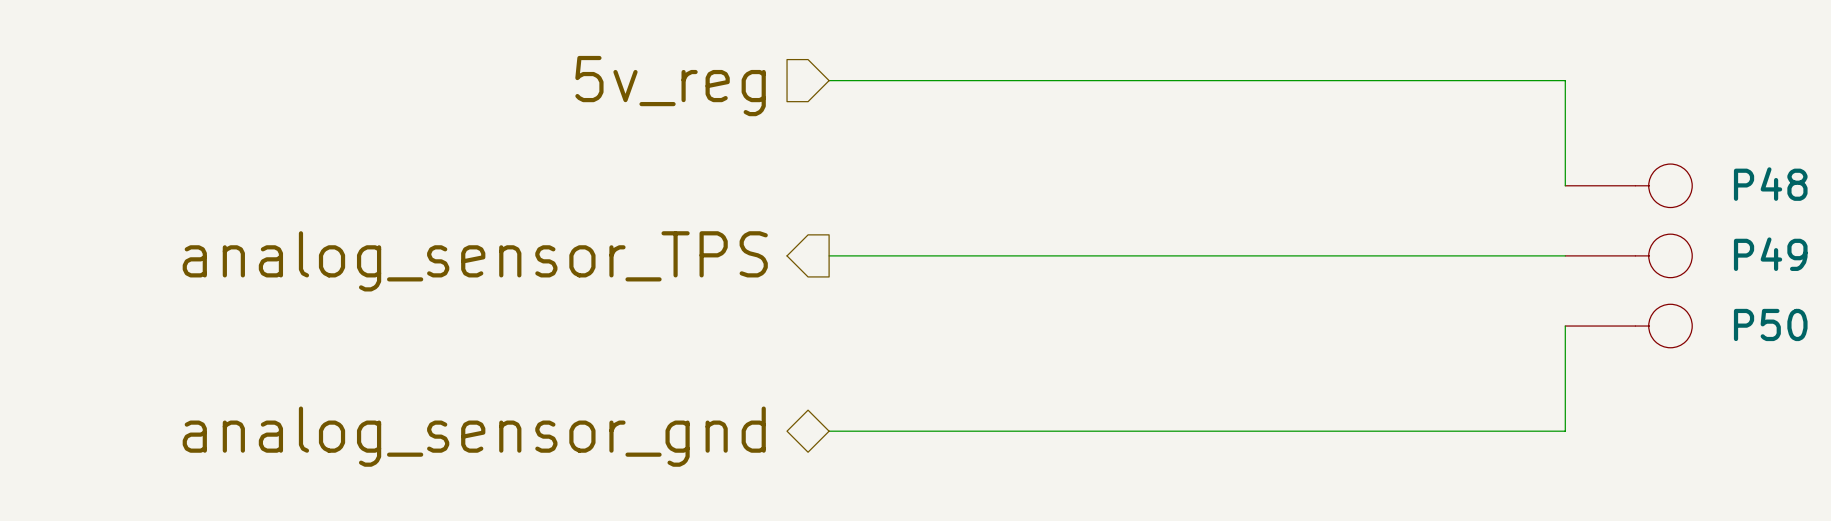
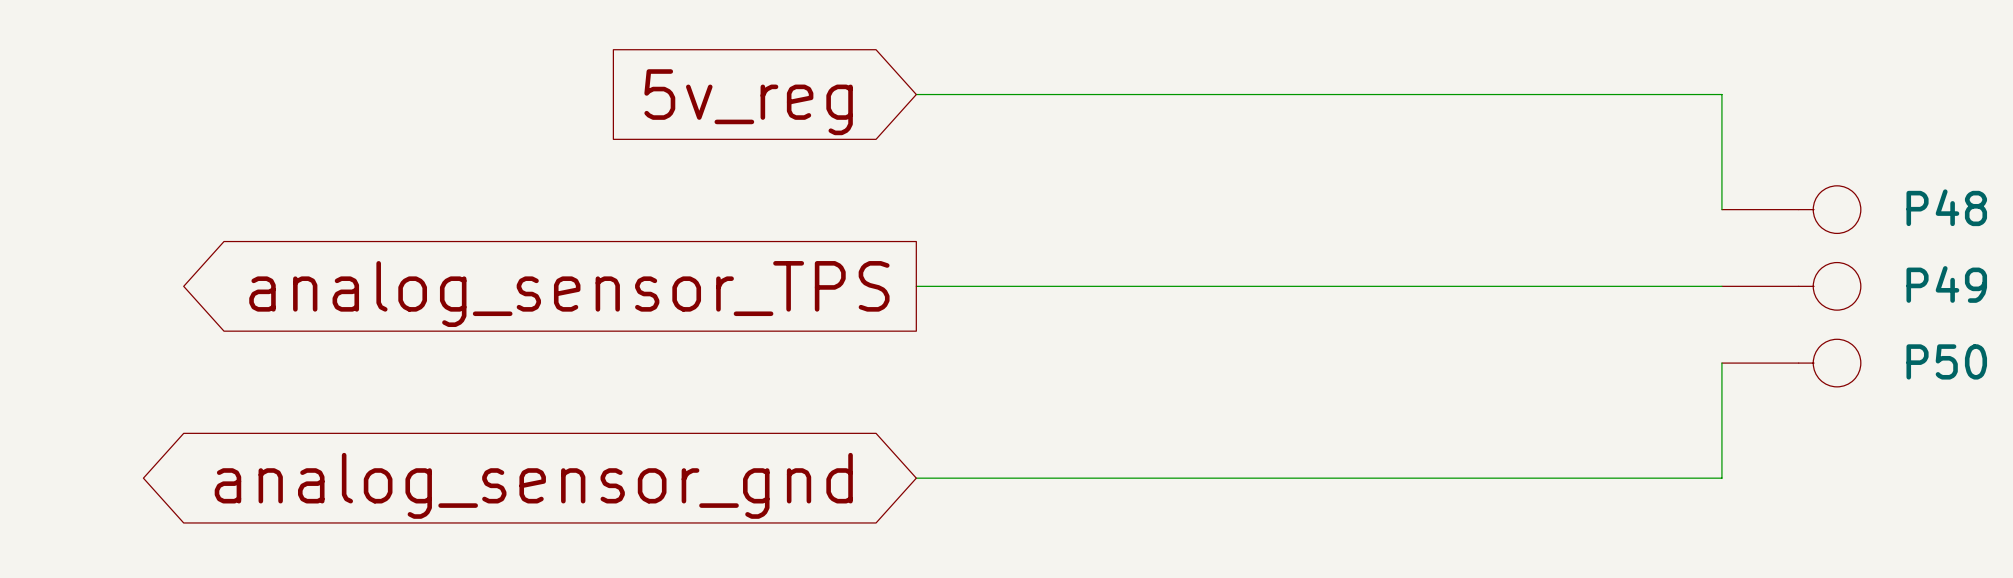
hierarchical label: 5v_reg (670, 86) -> none
global label: none -> 5v_reg (748, 102)
hierarchical label: analog_sensor_TPS (475, 261) -> none
global label: none -> analog_sensor_TPS (569, 294)
hierarchical label: analog_sensor_gnd (474, 436) -> none
global label: none -> analog_sensor_gnd (533, 485)

